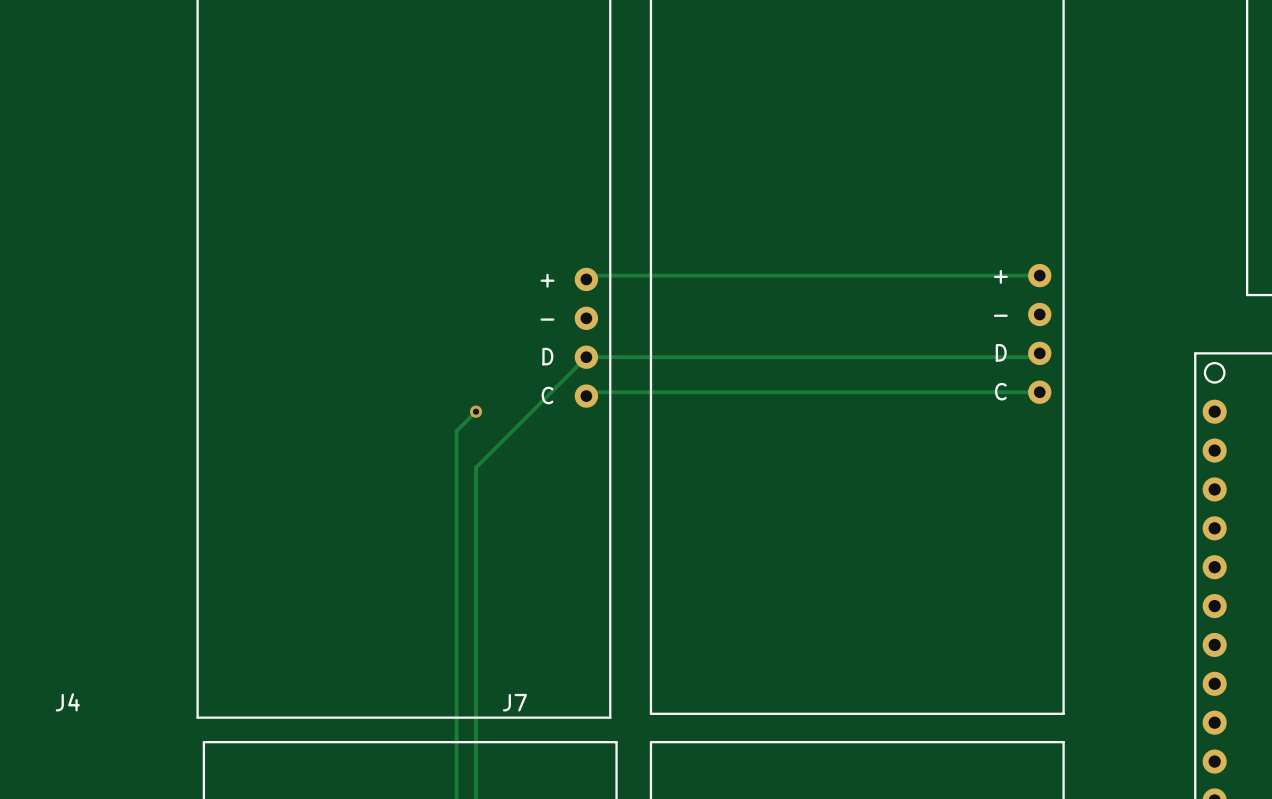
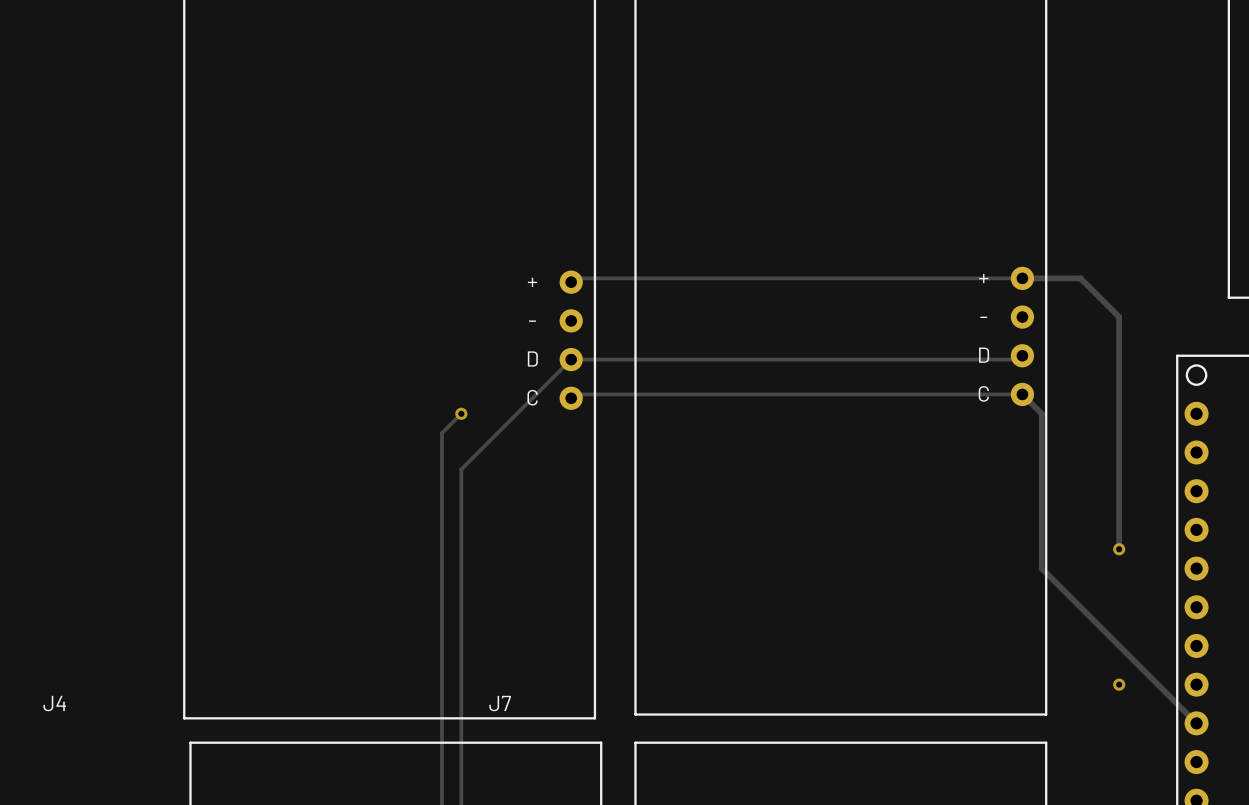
track: none -> (1022, 278) (1080, 278) (1119, 317) (1119, 549)
track: none -> (1022, 394) (1041, 413) (1041, 568) (1196, 723)
via: none -> (1119, 549)
via: none -> (1119, 684)

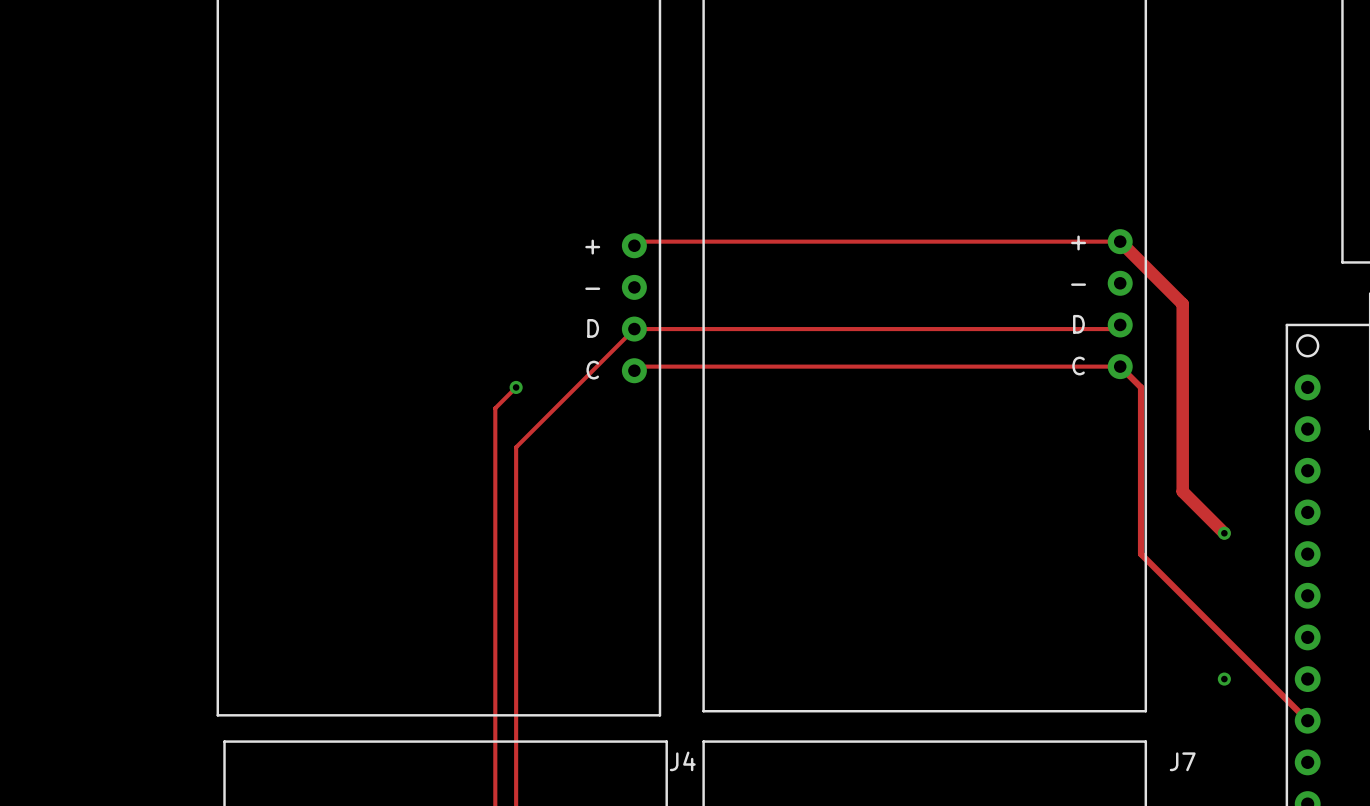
track: (1022, 278) (1080, 278) (1119, 317) (1119, 549) -> (1120, 241) (1182, 304) (1182, 491) (1224, 533)
J4 name position: J4 (54, 703) -> J4 (682, 761)
J7 name position: J7 (500, 703) -> J7 (1182, 761)

